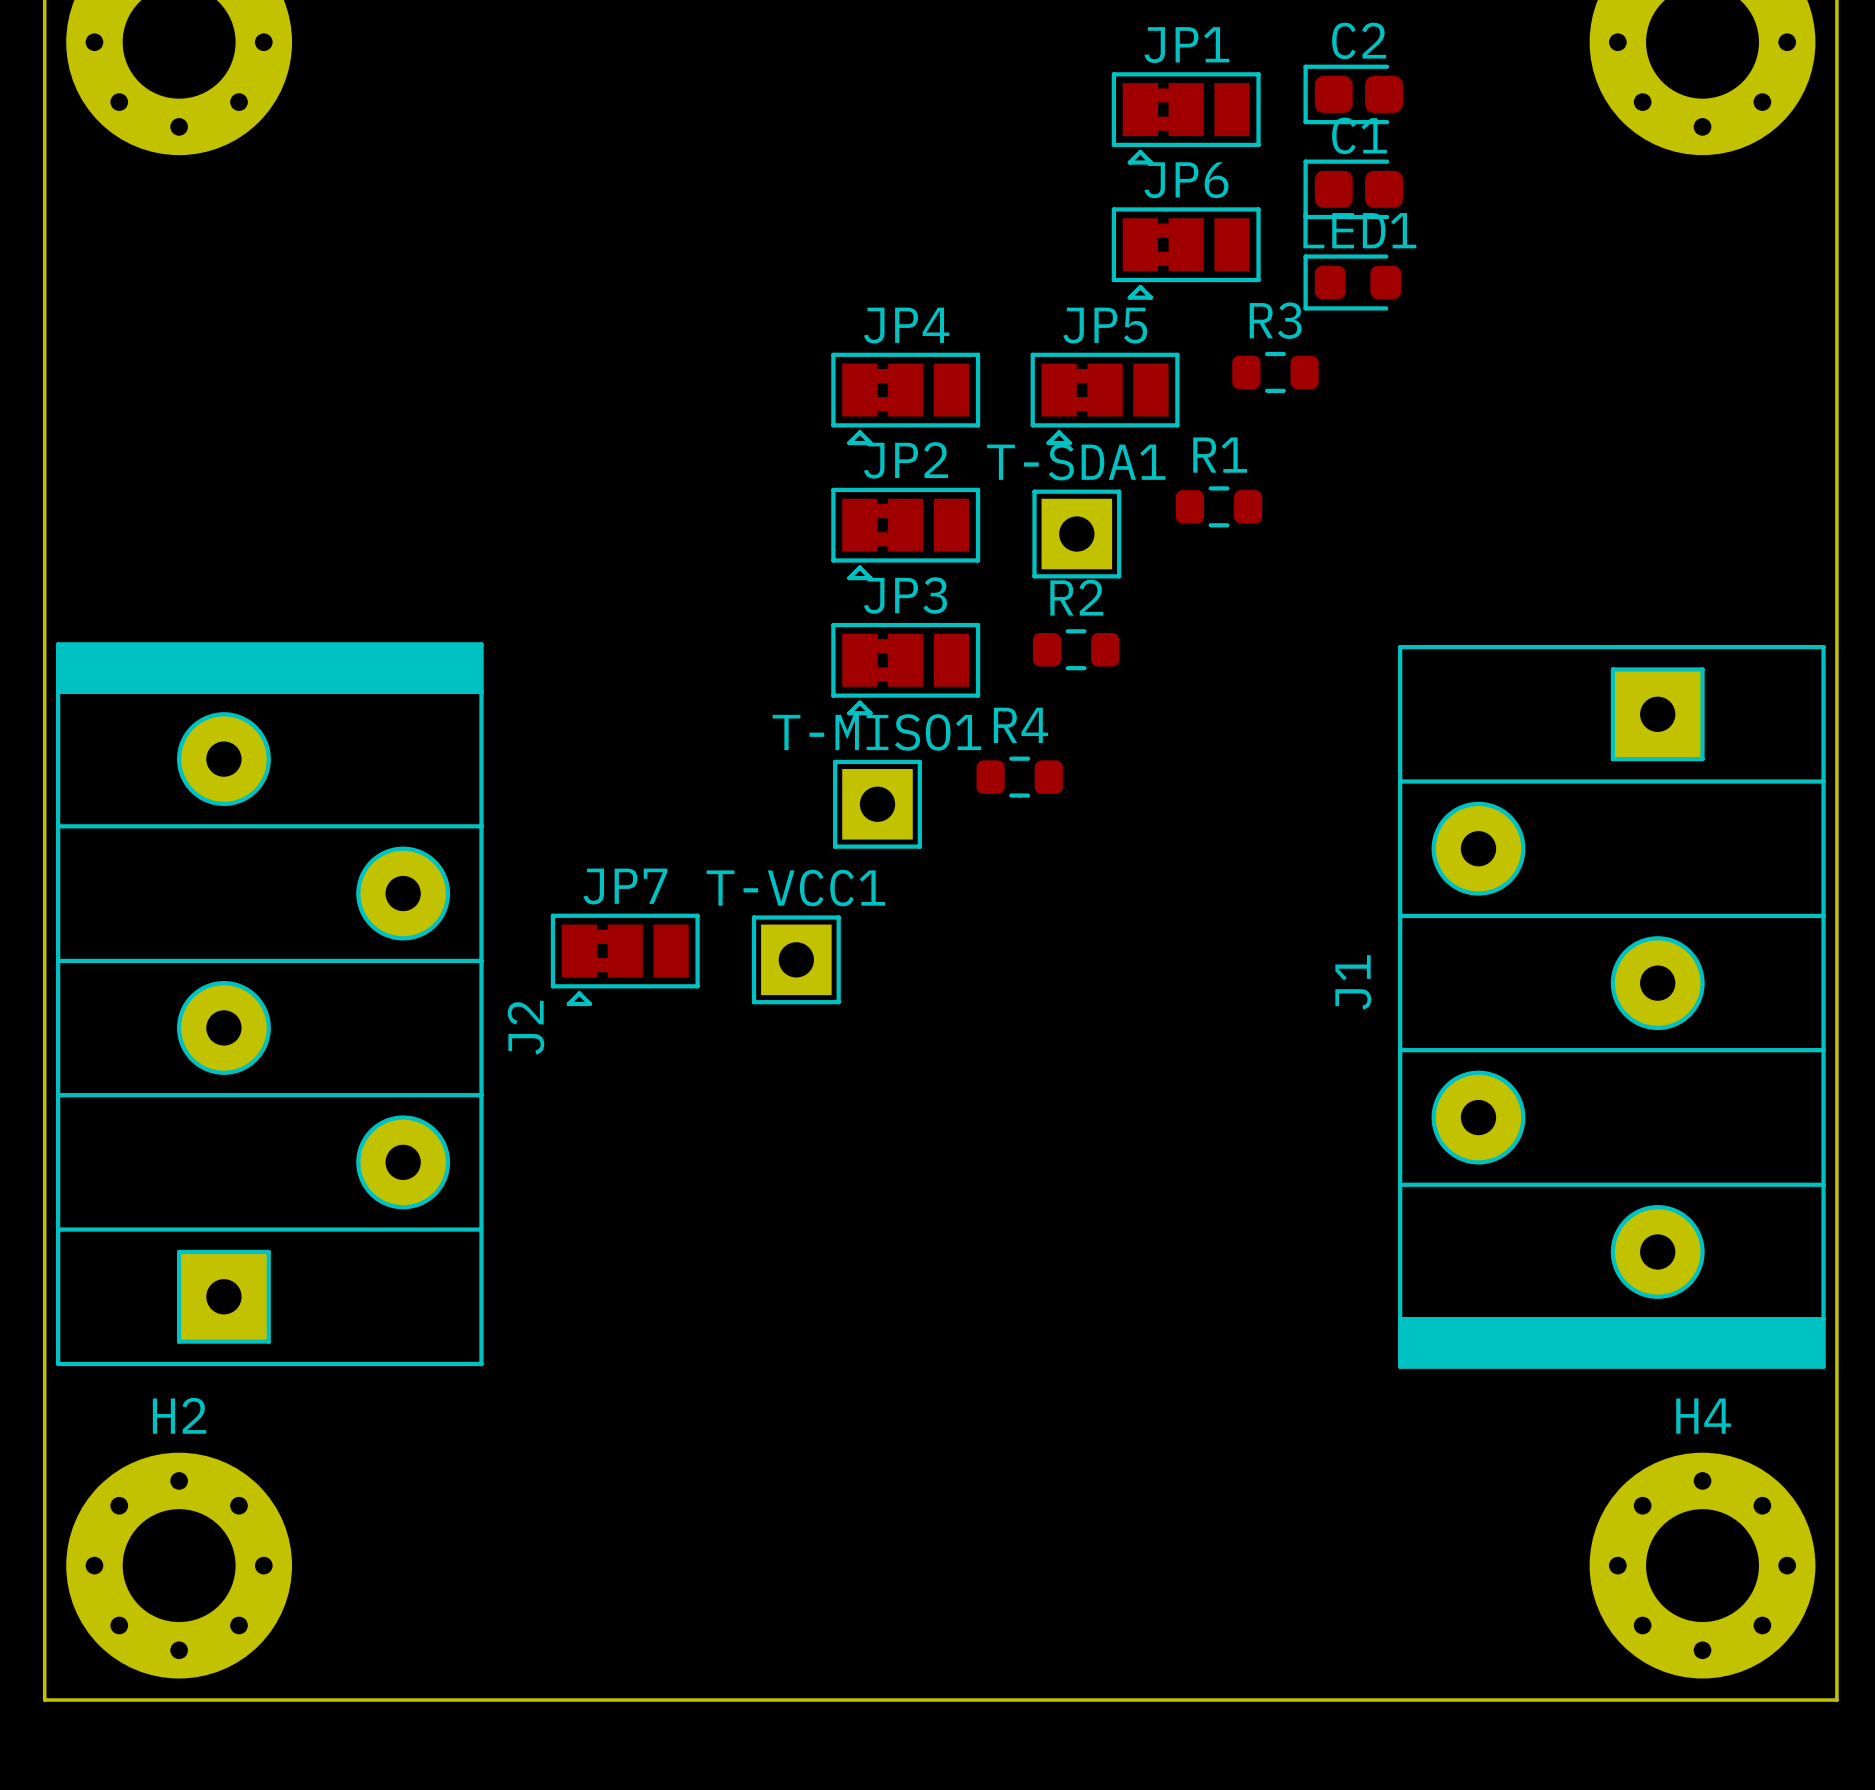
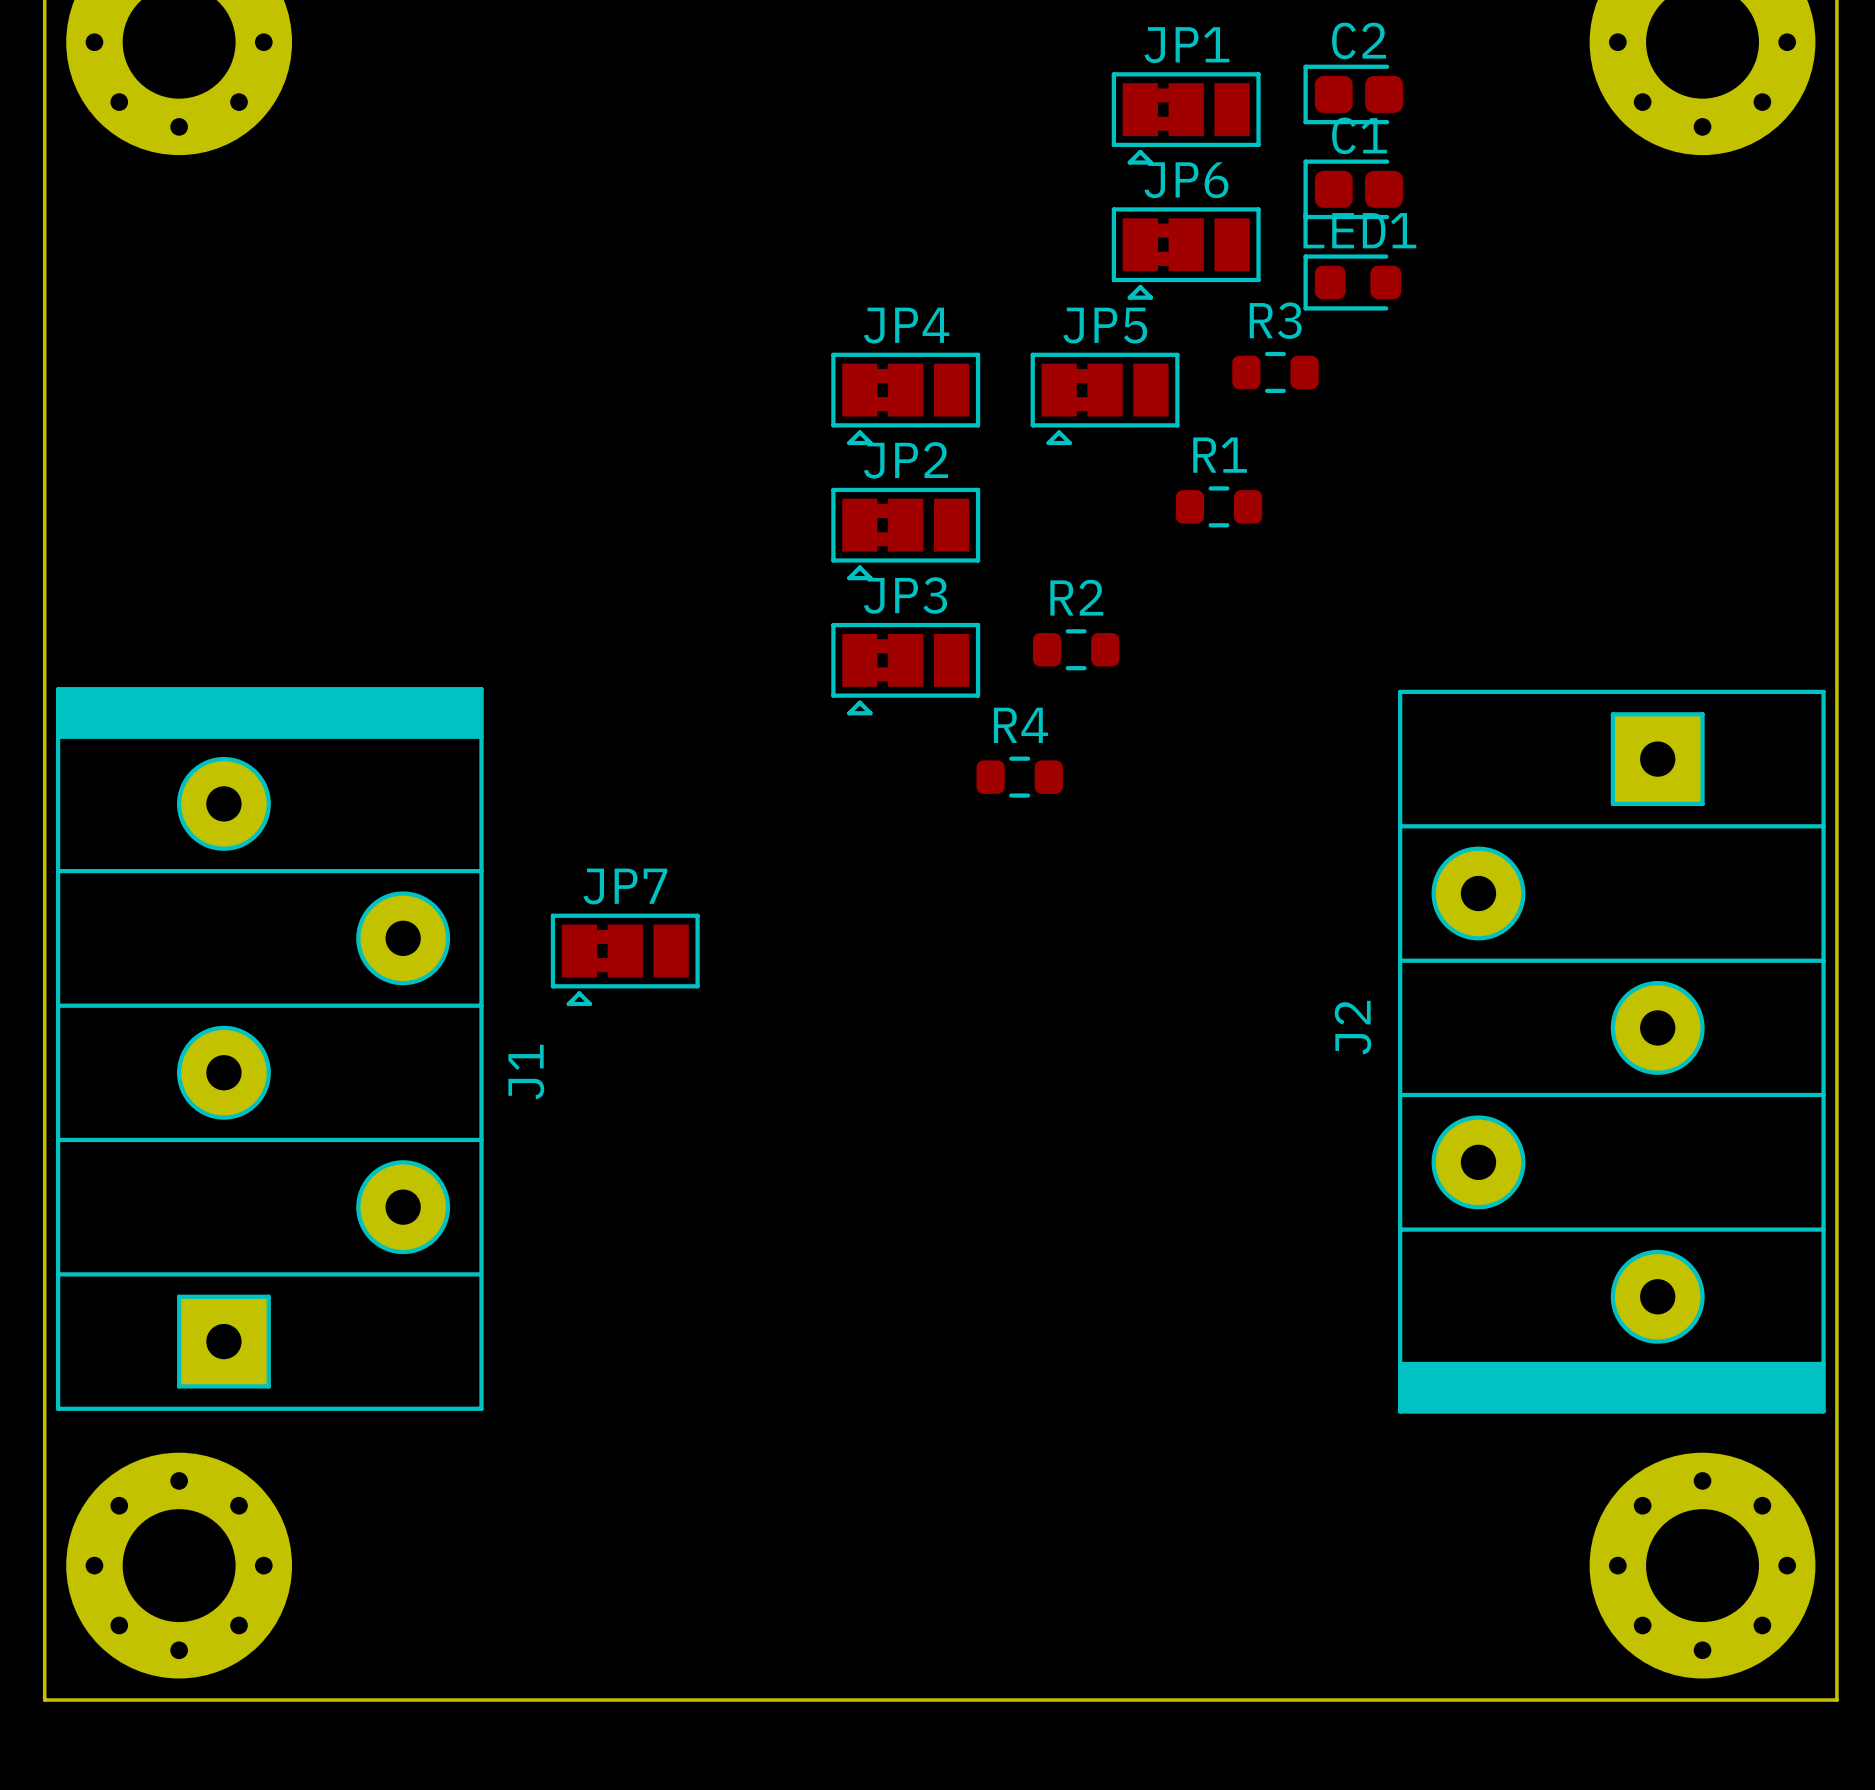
T-SDA1: (1076, 534) -> none
T-MISO1: (877, 804) -> none
T-VCC1: (796, 959) -> none
J2 rotation: 0° (269, 1004) -> 180° (1611, 1051)
J2 position: (269, 1004) -> (1611, 1051)
J1 rotation: 0° (1611, 1006) -> 180° (269, 1049)
J1 position: (1611, 1006) -> (269, 1049)
H2 name: H2 (179, 1415) -> none
H4 name: H4 (1703, 1416) -> none

